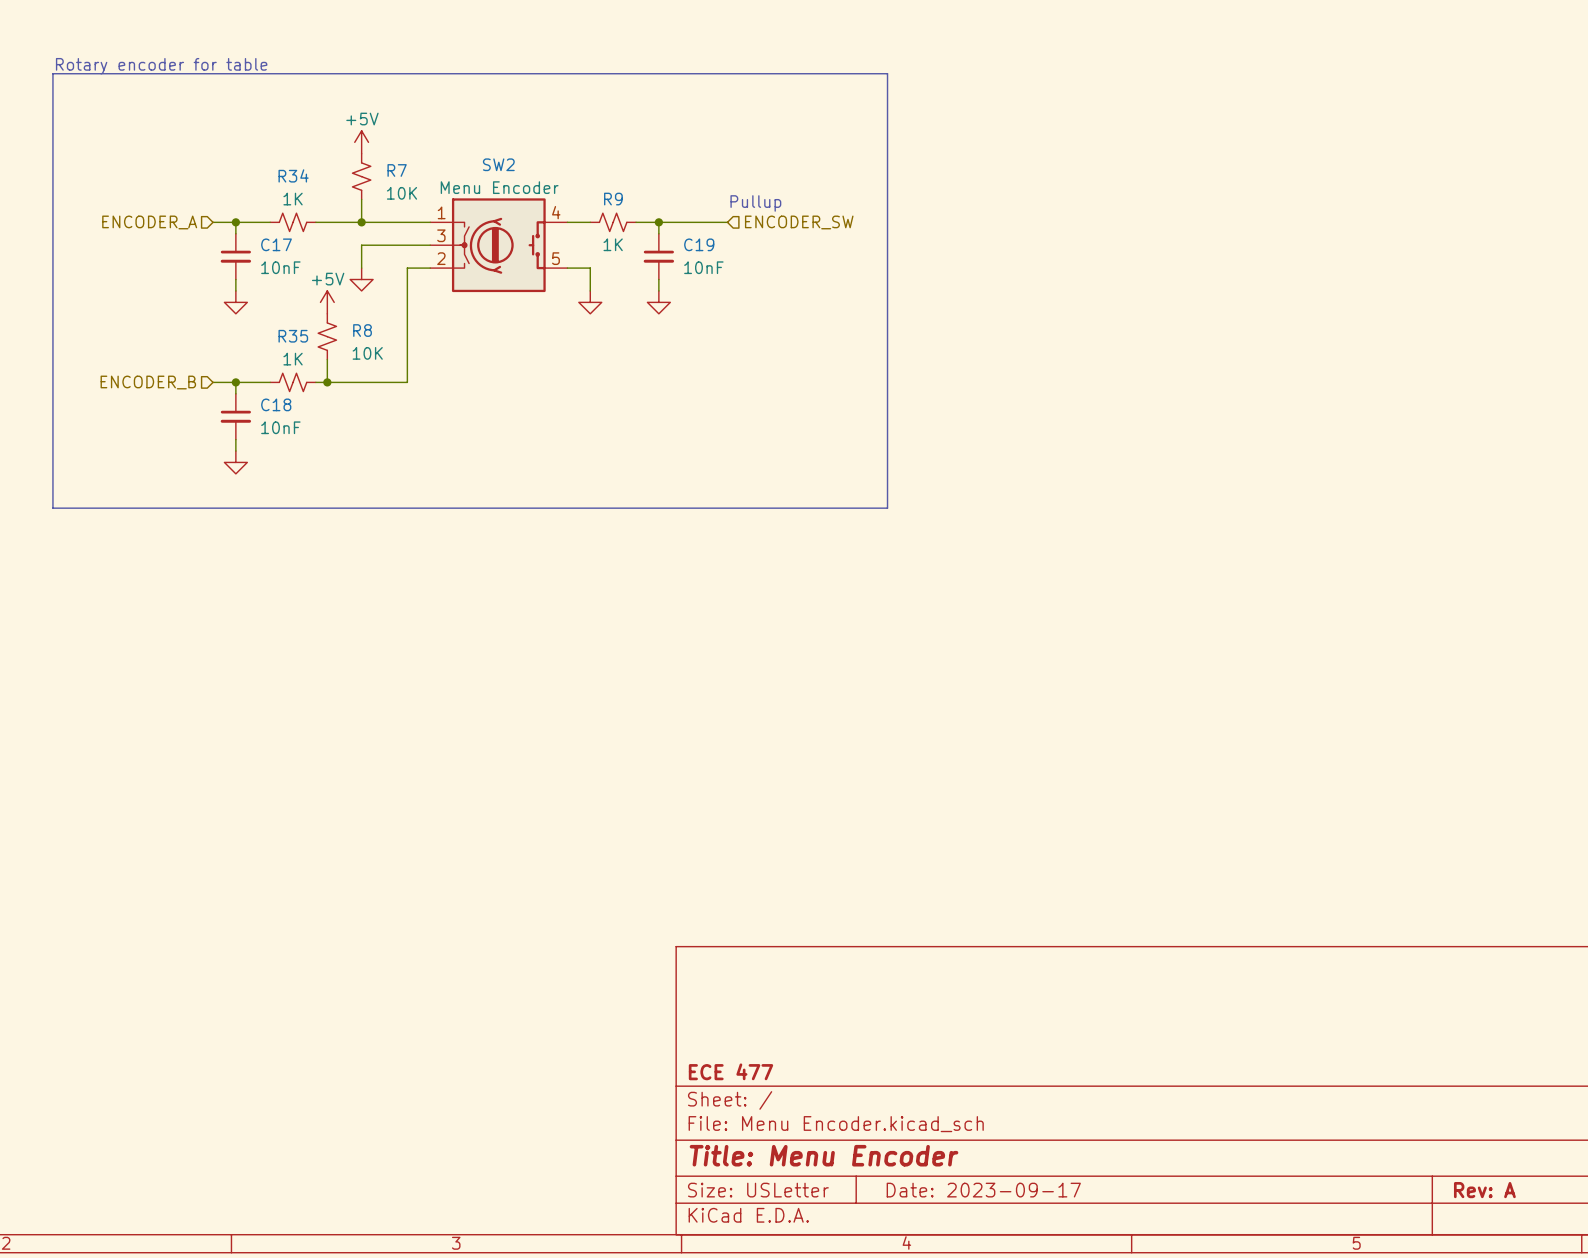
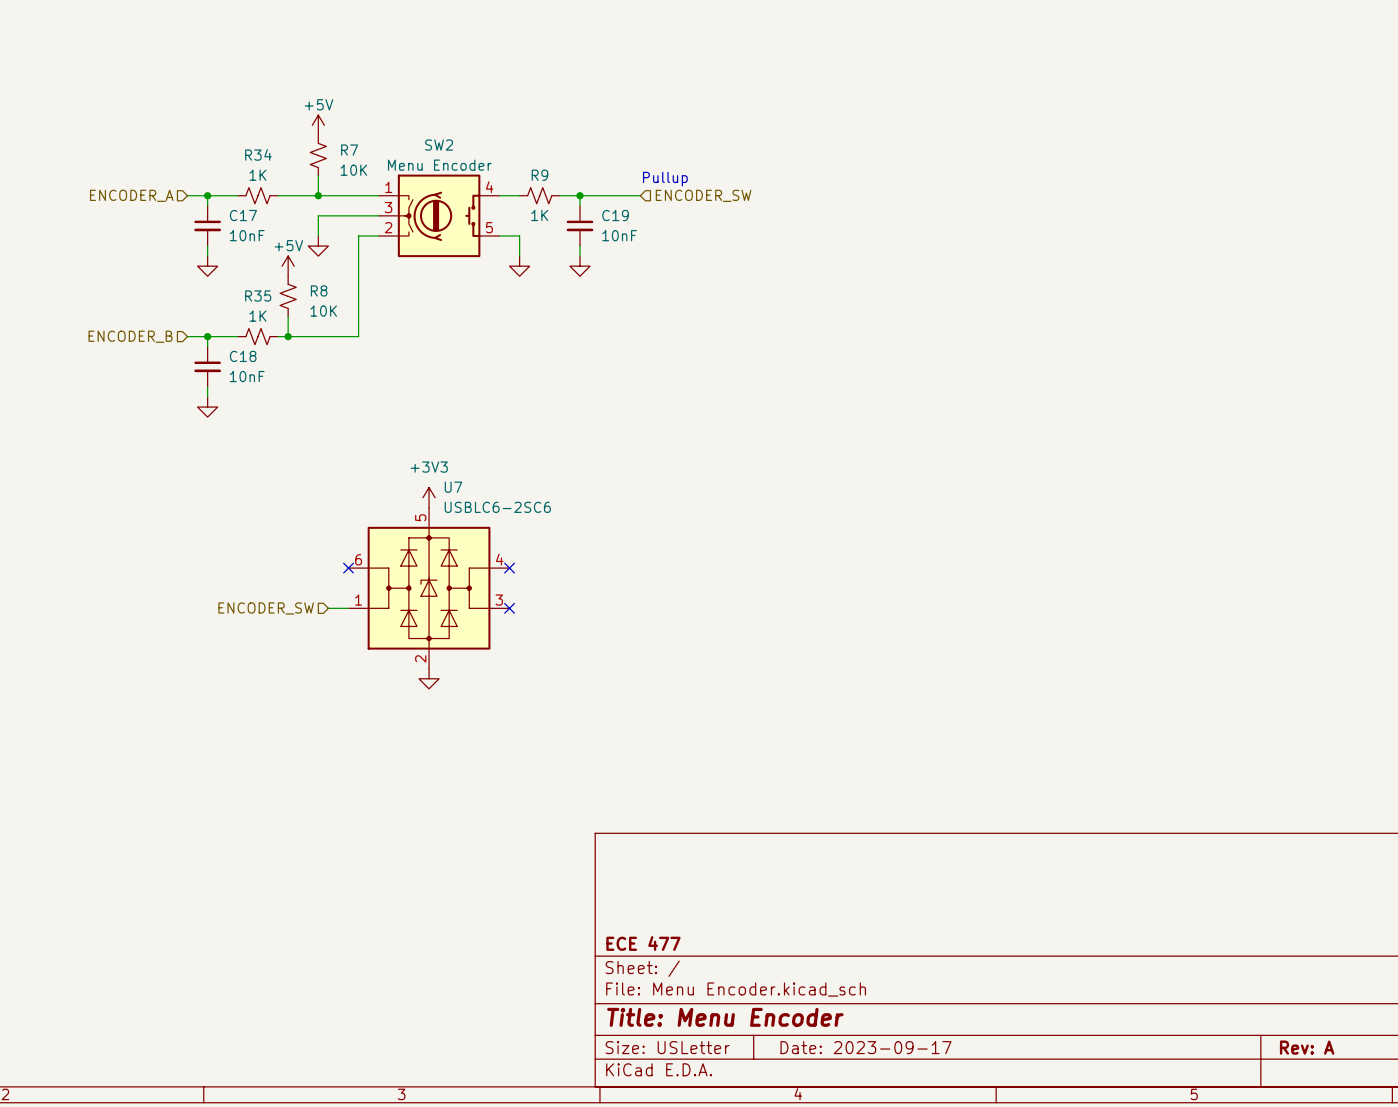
text: Rotary encoder for table (161, 66) -> none
line: (52, 73) (887, 73) (887, 508) (52, 508) (52, 73) -> none
power symbol: none -> +3V3 (429, 497)
no-connect mark: none -> (348, 568)
no-connect mark: none -> (509, 568)
U7: none -> USBLC6-2SC6 (429, 588)
hierarchical label: none -> ENCODER_SW (266, 608)
wire: none -> (328, 608) (348, 608)
no-connect mark: none -> (509, 608)
power symbol: none -> (429, 678)

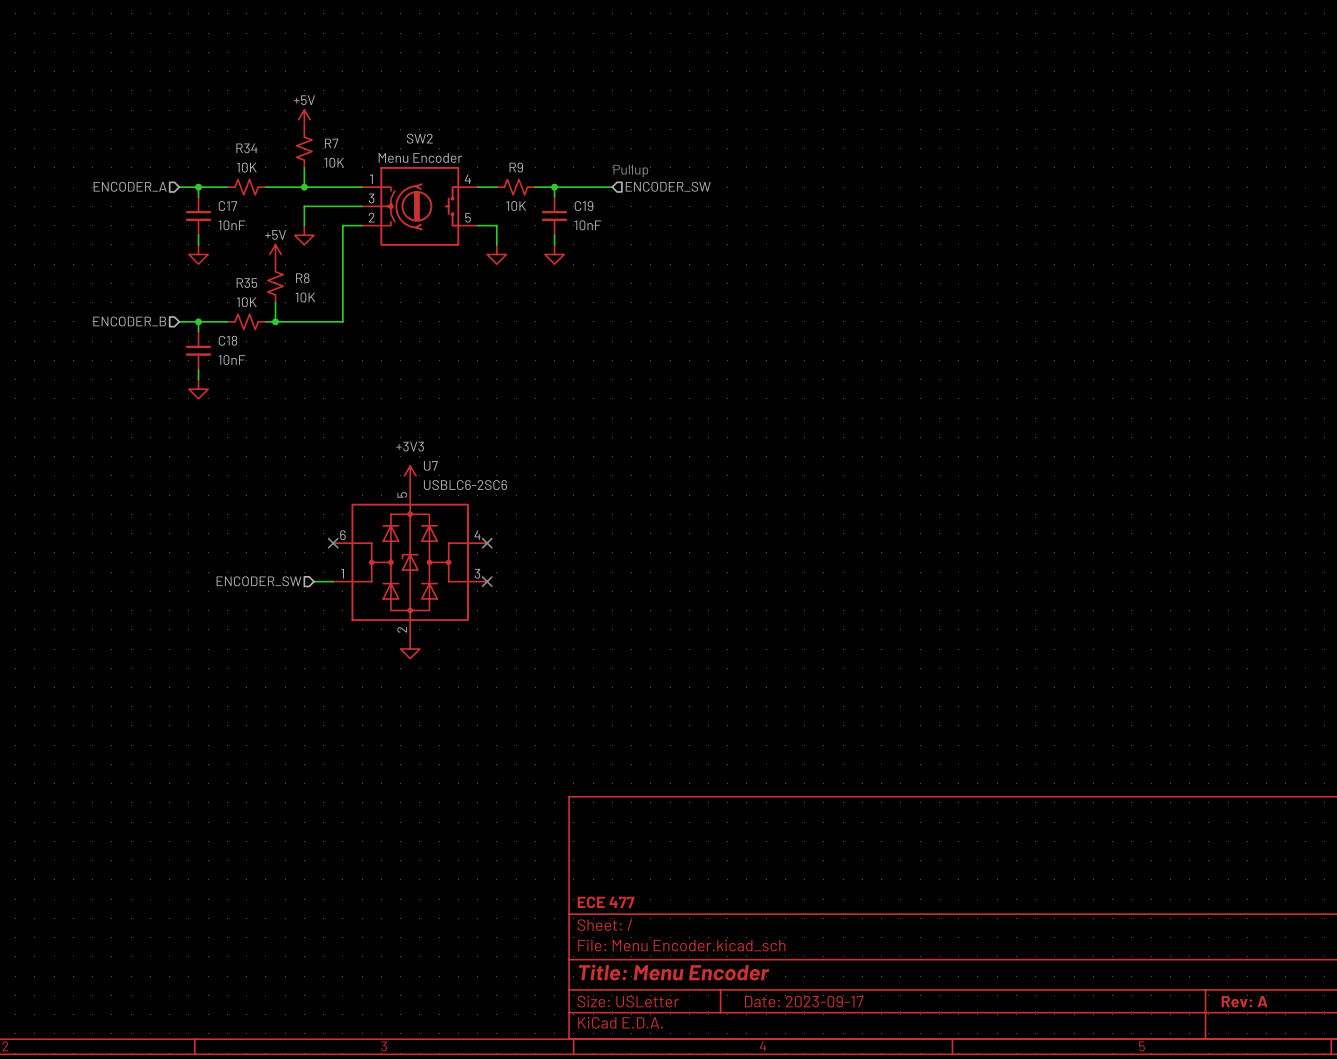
R34 value: 1K (257, 175) -> 10K (246, 167)
R9 value: 1K (539, 215) -> 10K (516, 206)
R35 value: 1K (257, 316) -> 10K (246, 302)

